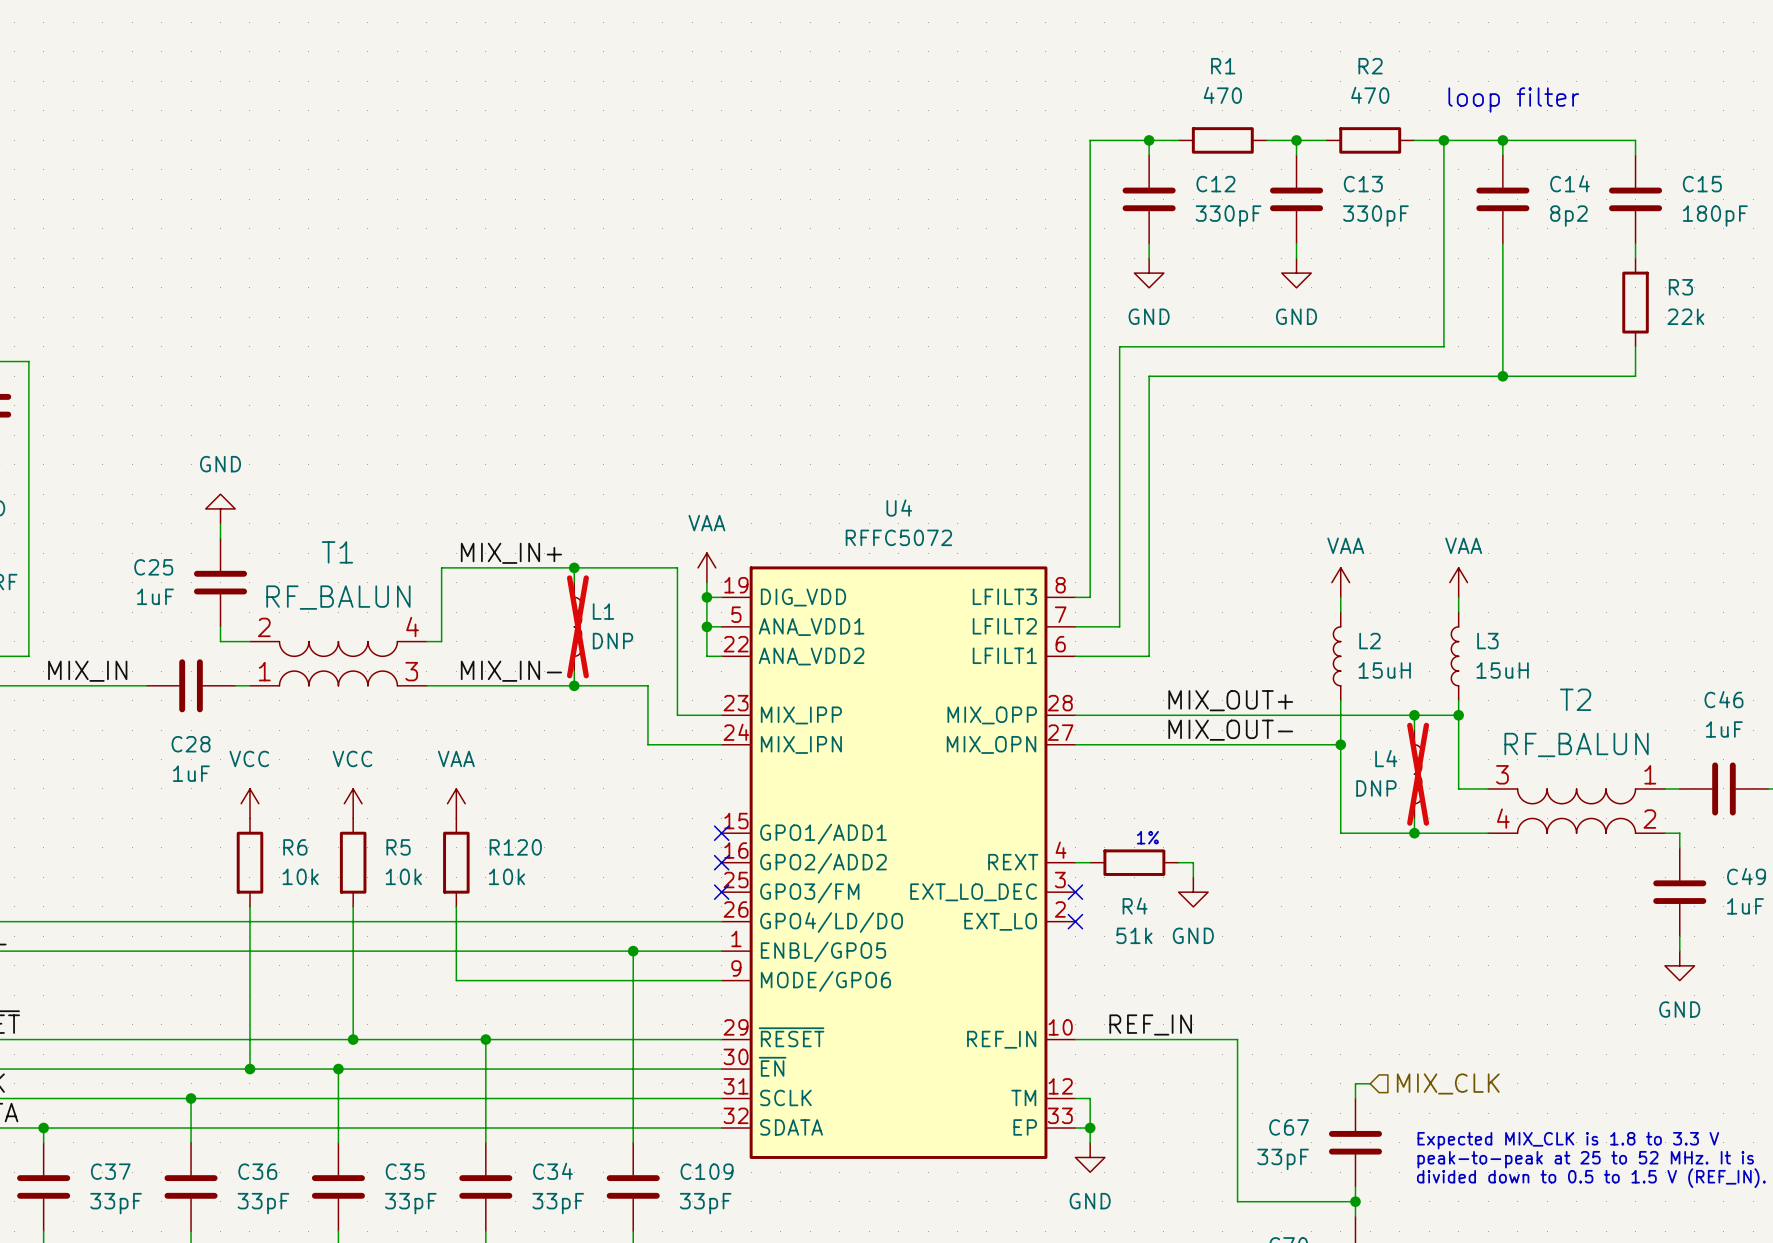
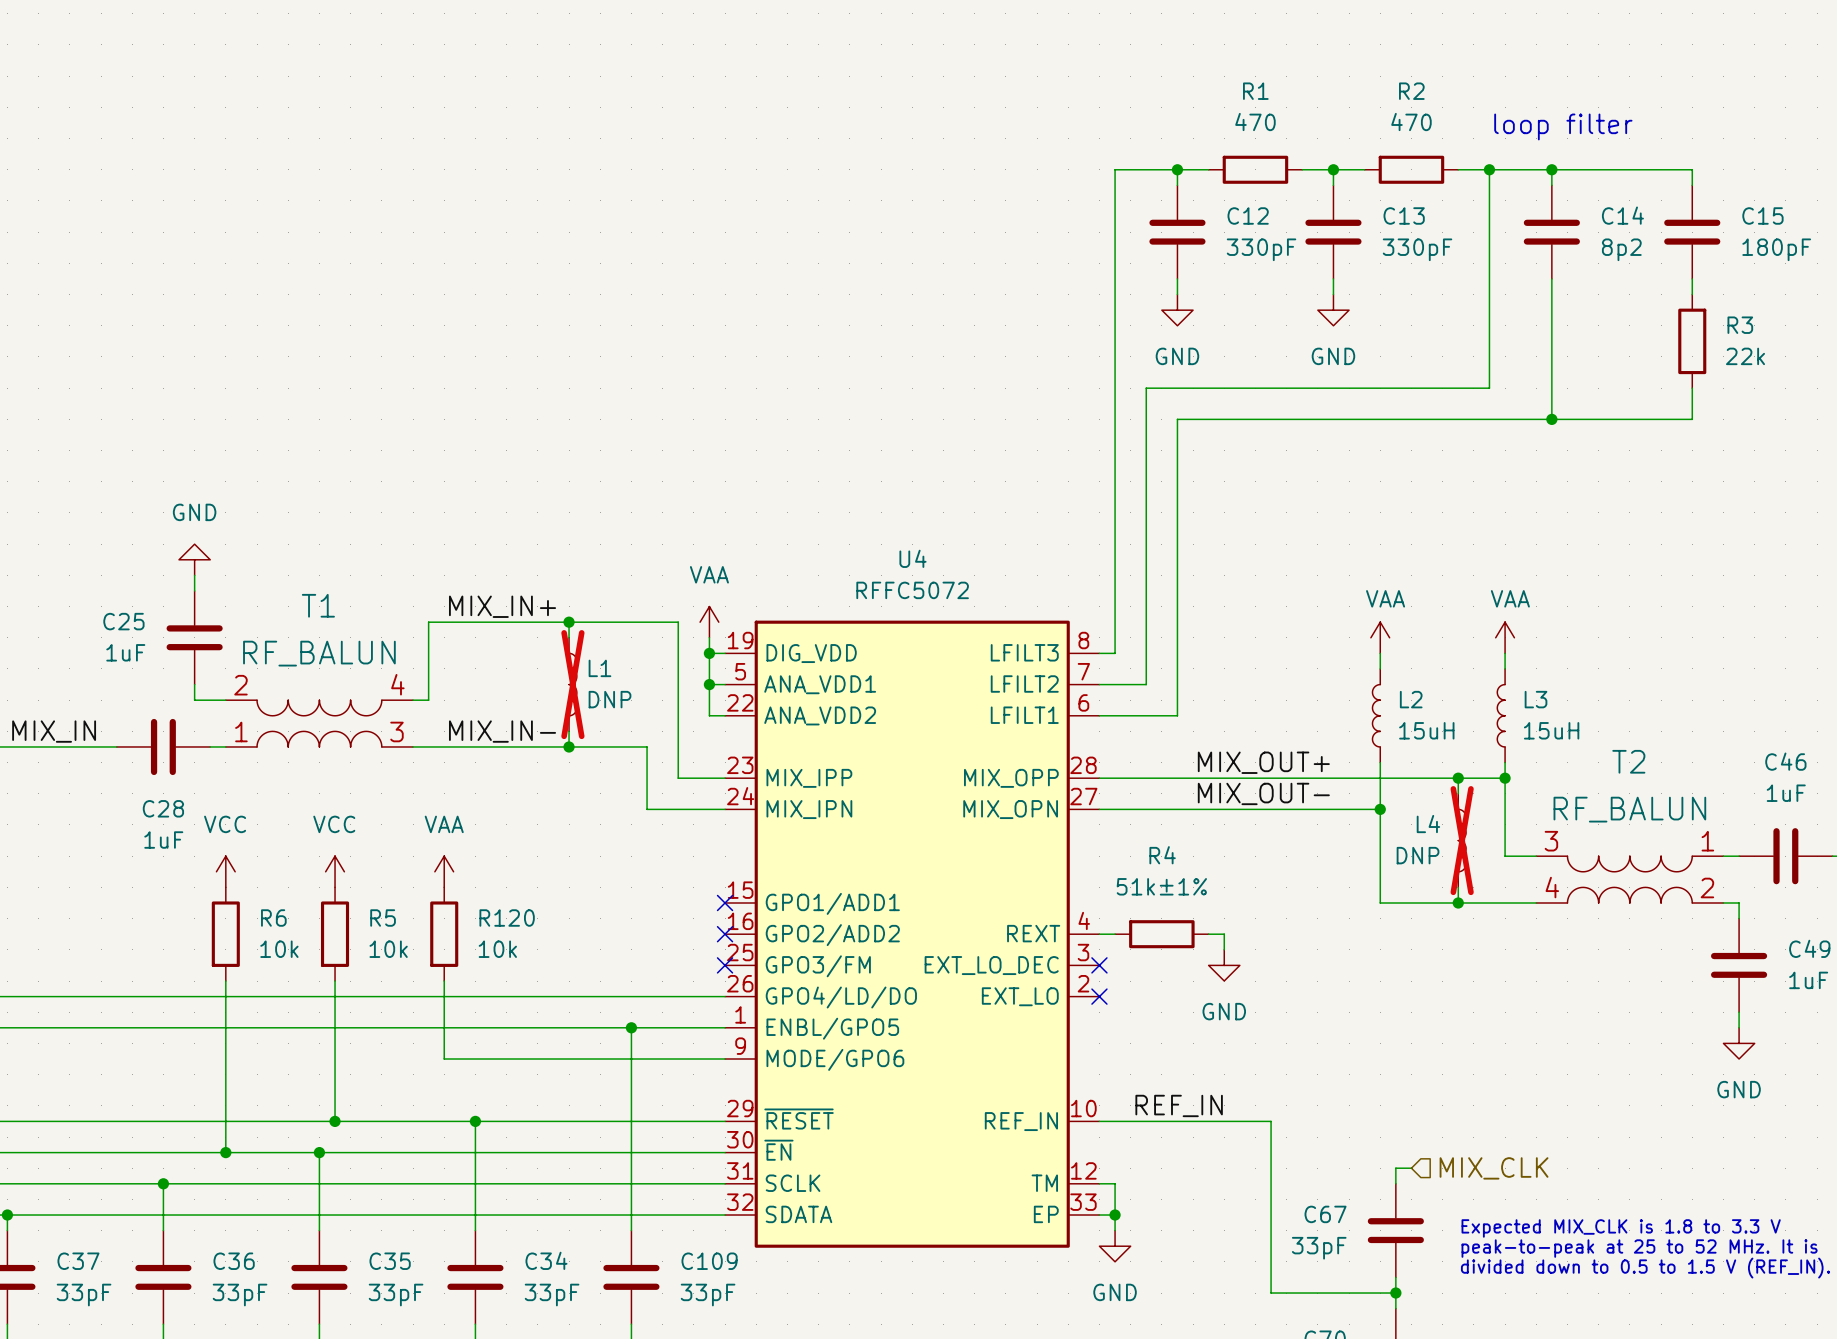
text: 1% (1147, 837) -> none
R4 name position: R4 (1135, 906) -> R4 (1162, 855)
R4 value: 51k (1134, 935) -> 51k±1% (1161, 886)

